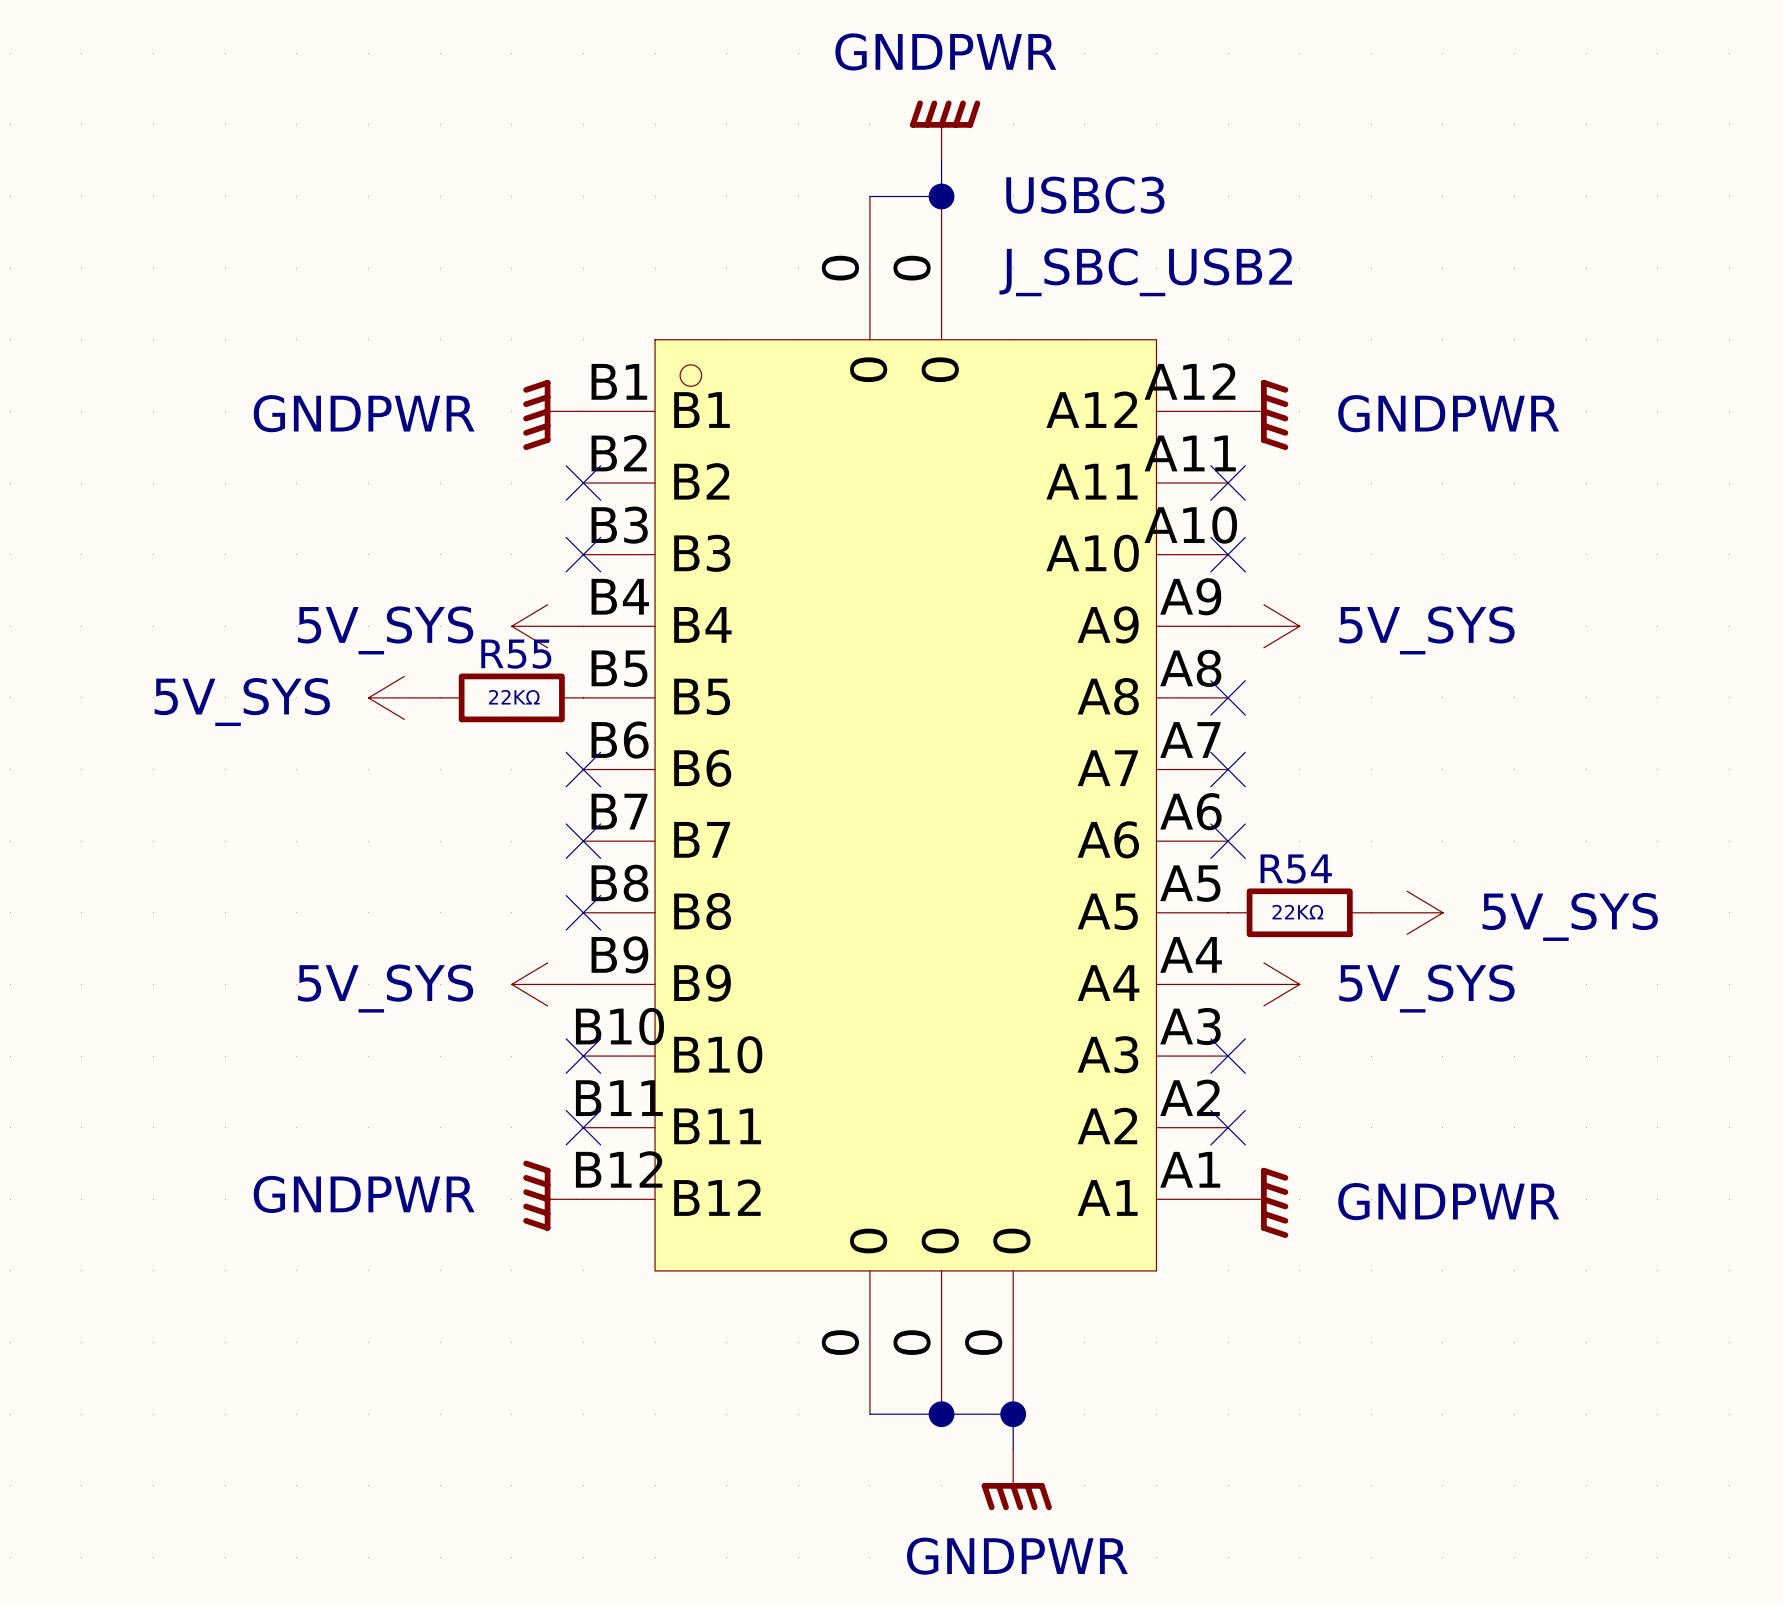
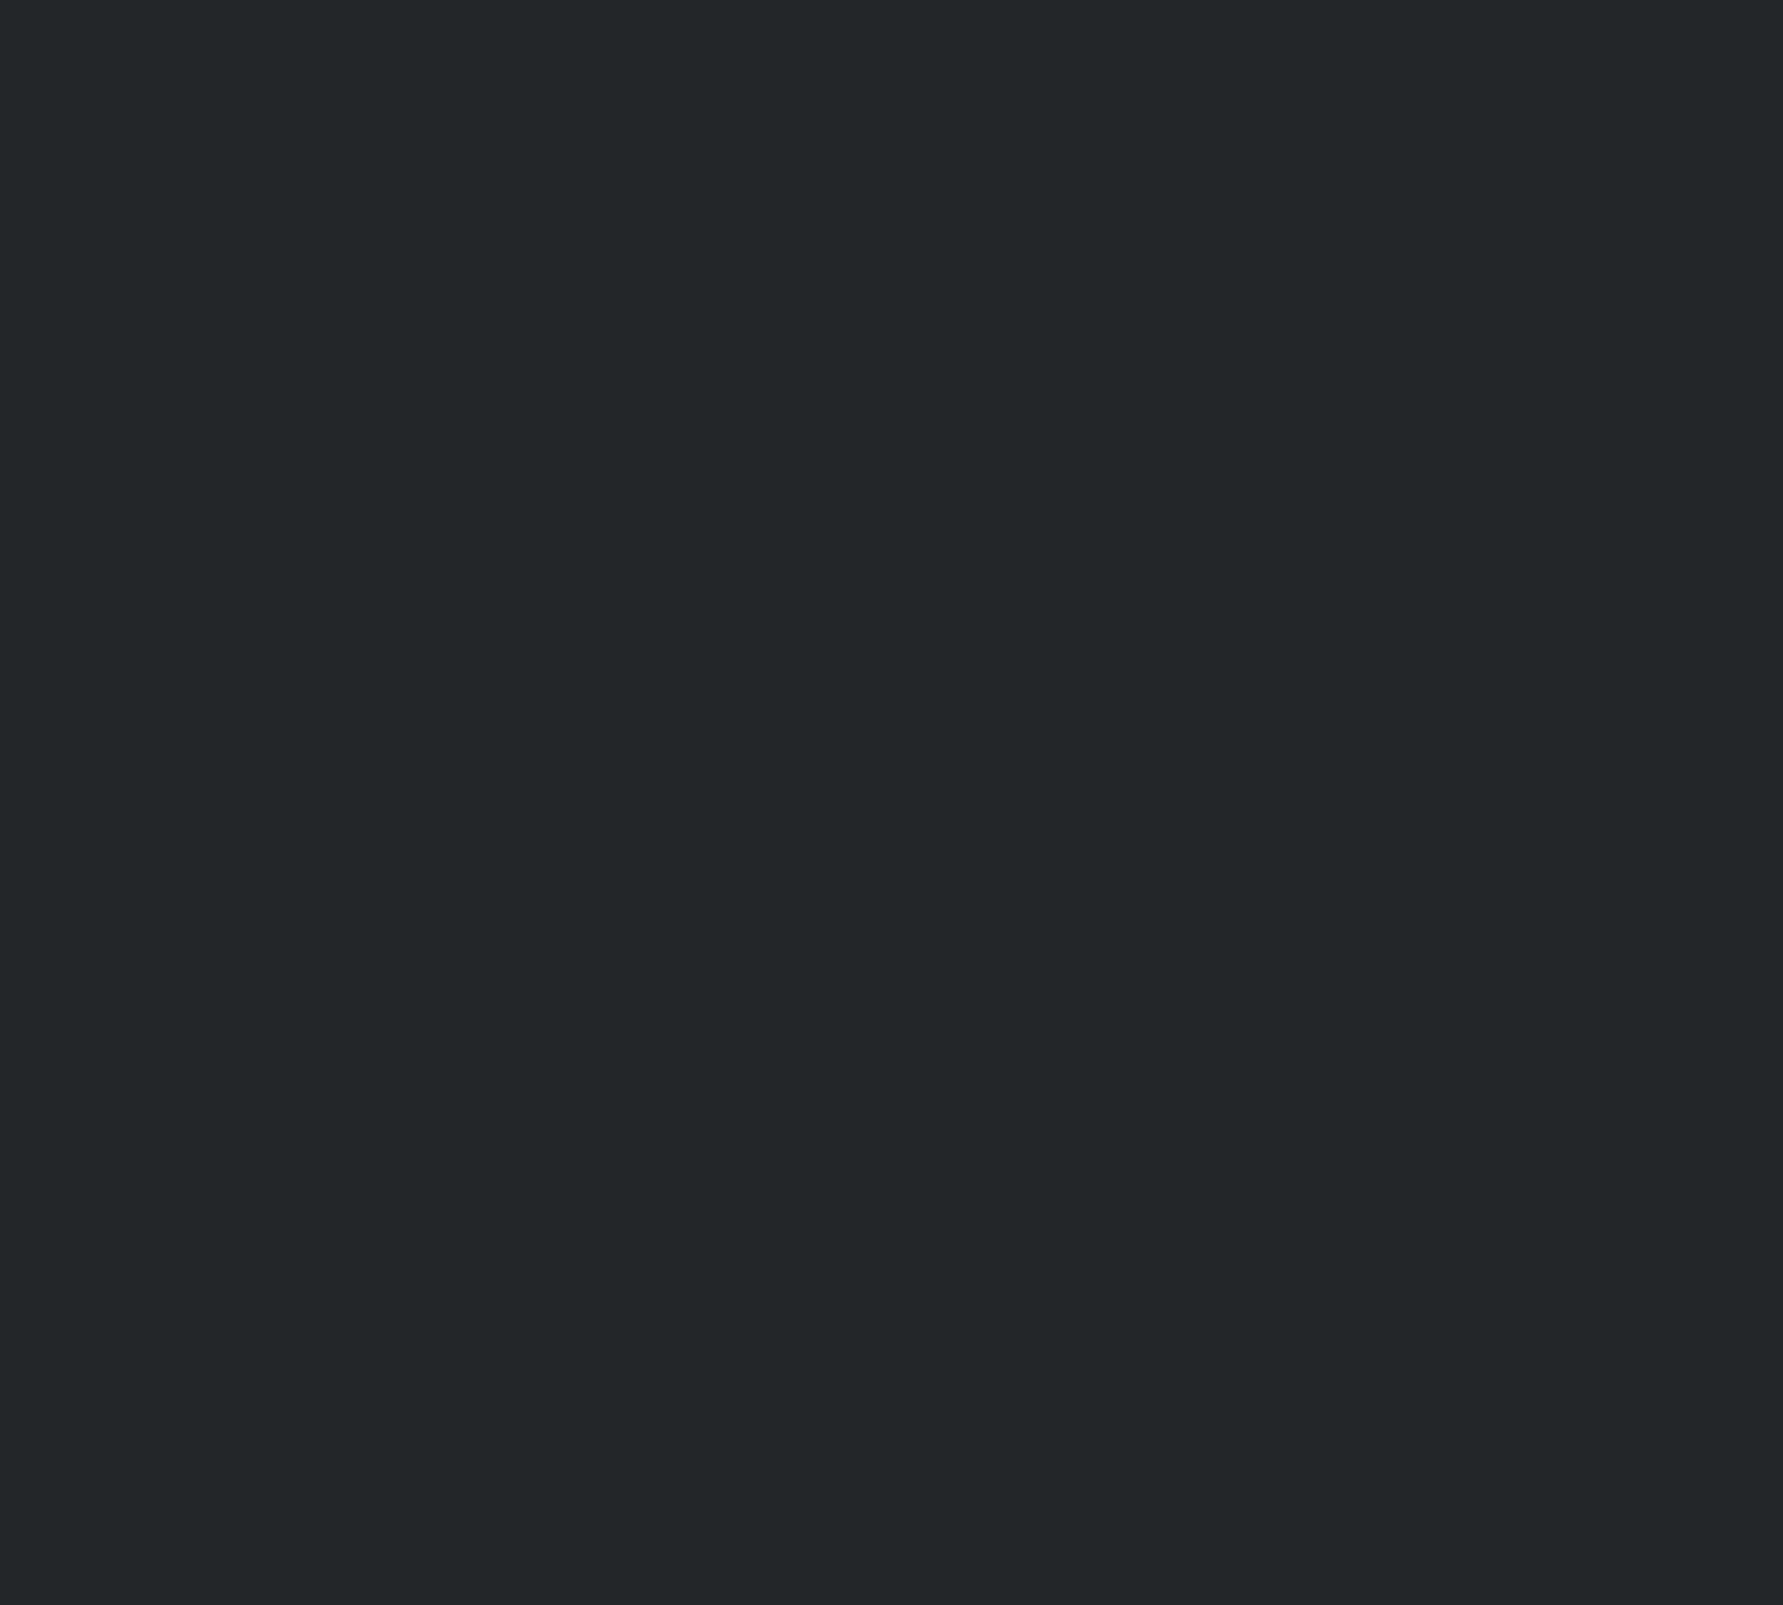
power symbol: GNDPWR (945, 130) -> none
wire: (941, 160) (941, 196) (869, 196) -> none
junction: (941, 196) -> none
power symbol: GNDPWR (553, 414) -> none
power symbol: GNDPWR (1258, 414) -> none
no-connect mark: (583, 483) -> none
no-connect mark: (1228, 483) -> none
no-connect mark: (583, 554) -> none
no-connect mark: (1228, 554) -> none
power symbol: 5V_SYS (547, 626) -> none
power symbol: 5V_SYS (1263, 626) -> none
power symbol: 5V_SYS (404, 697) -> none
R55: 22KΩ (511, 697) -> none
no-connect mark: (1228, 697) -> none
no-connect mark: (583, 769) -> none
no-connect mark: (1228, 769) -> none
USBC3: J_SBC_USB2 (905, 805) -> none
no-connect mark: (583, 841) -> none
no-connect mark: (1228, 841) -> none
no-connect mark: (583, 912) -> none
R54: 22KΩ (1299, 912) -> none
power symbol: 5V_SYS (1407, 912) -> none
power symbol: 5V_SYS (547, 984) -> none
power symbol: 5V_SYS (1263, 984) -> none
no-connect mark: (583, 1056) -> none
no-connect mark: (1228, 1056) -> none
no-connect mark: (583, 1127) -> none
no-connect mark: (1228, 1127) -> none
power symbol: GNDPWR (553, 1195) -> none
power symbol: GNDPWR (1258, 1202) -> none
wire: (869, 1414) (1013, 1414) (1013, 1450) -> none
junction: (941, 1414) -> none
junction: (1013, 1414) -> none
power symbol: GNDPWR (1016, 1480) -> none

